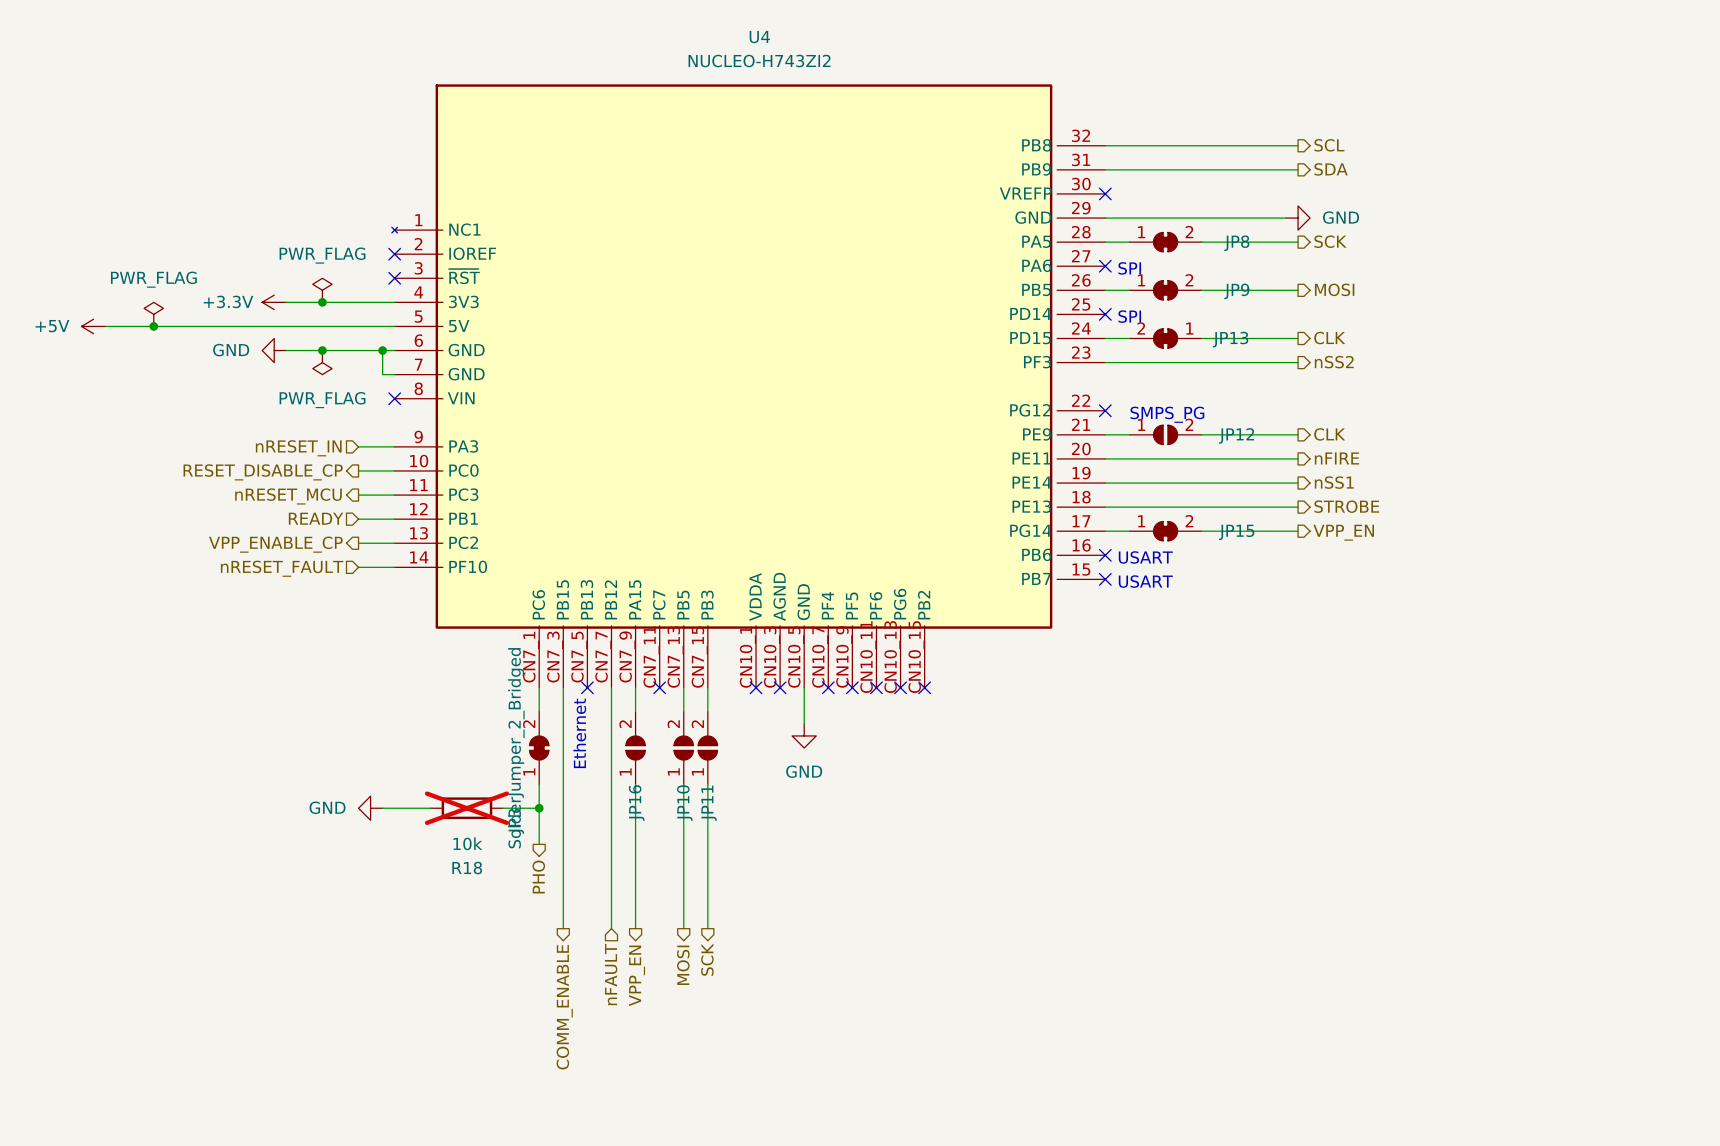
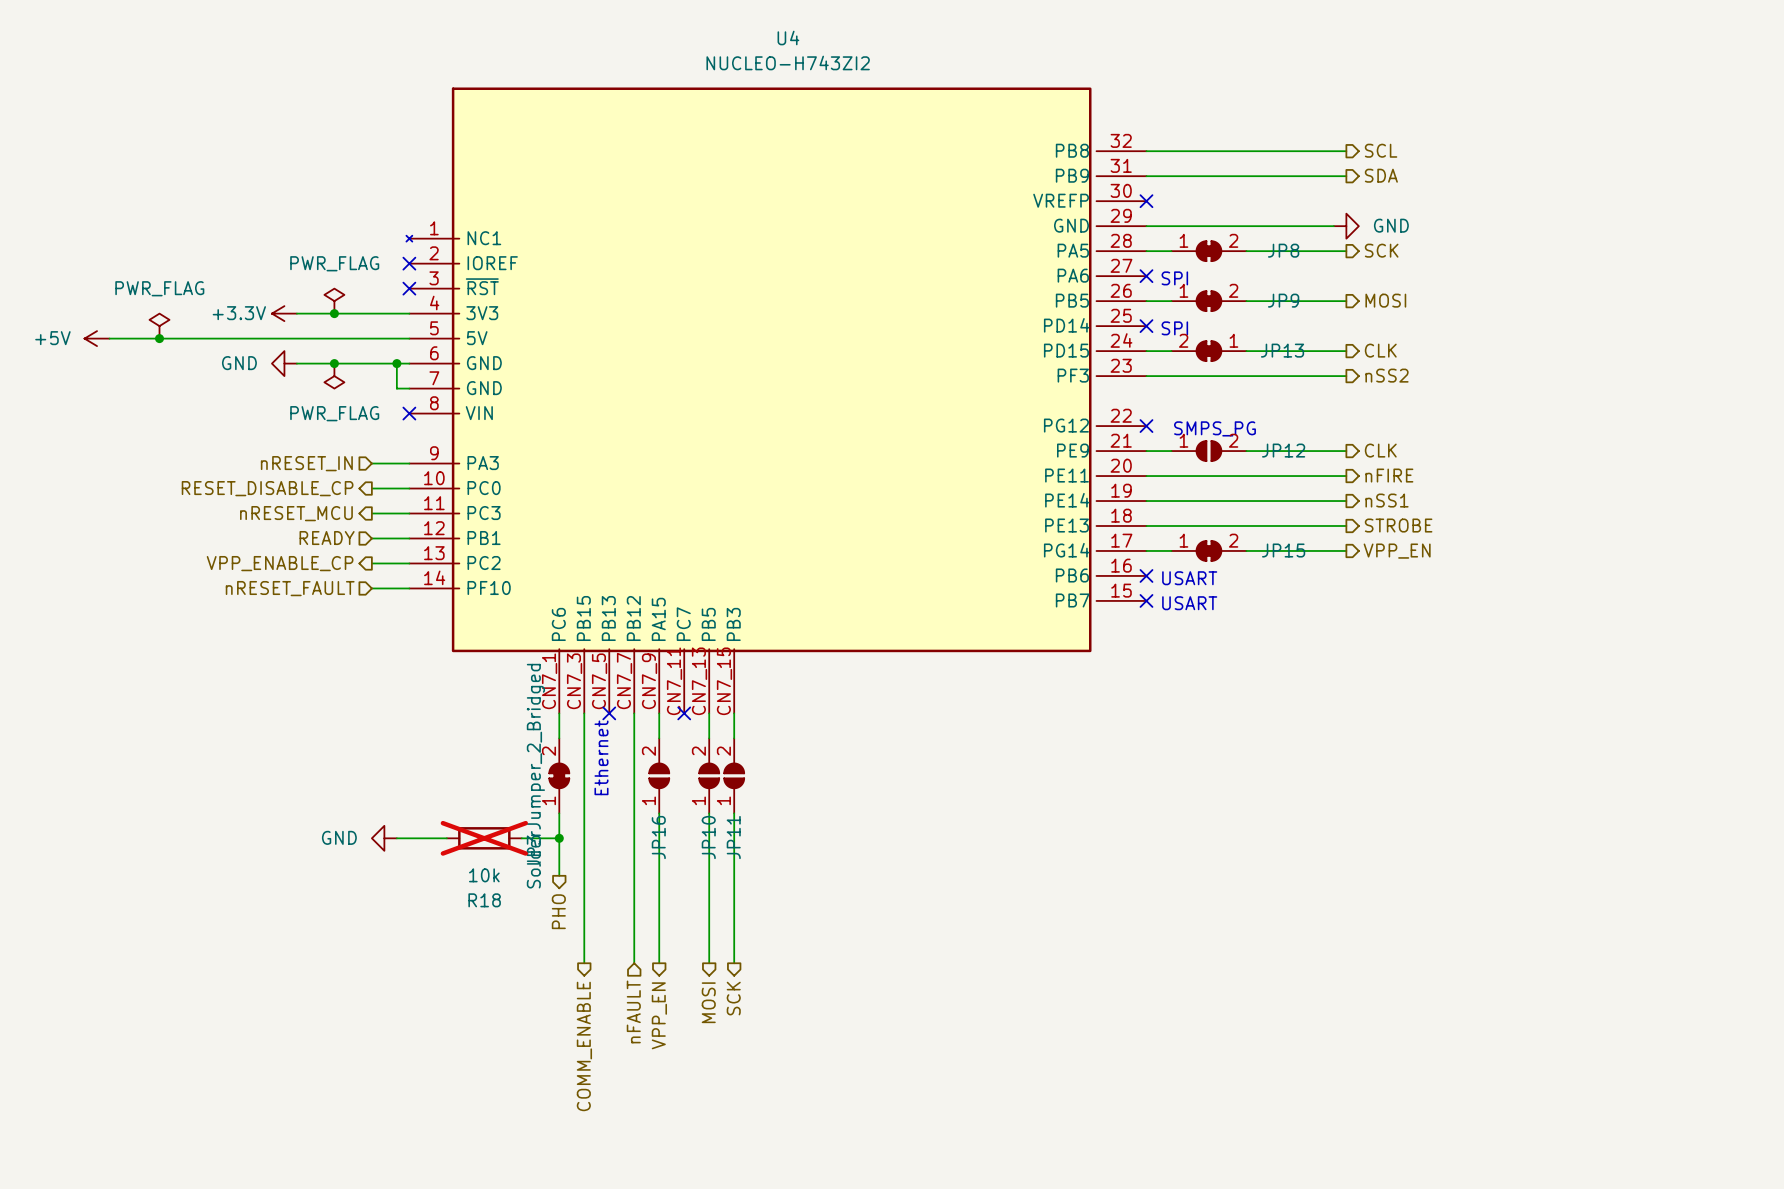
U4 symbol: [391, 84, 1106, 688] -> [406, 87, 1147, 714]
no-connect mark: (756, 687) -> none
no-connect mark: (780, 687) -> none
wire: (804, 687) (804, 723) -> none
no-connect mark: (828, 687) -> none
no-connect mark: (852, 687) -> none
no-connect mark: (876, 687) -> none
no-connect mark: (900, 687) -> none
no-connect mark: (924, 687) -> none
power symbol: GND (804, 735) -> none

